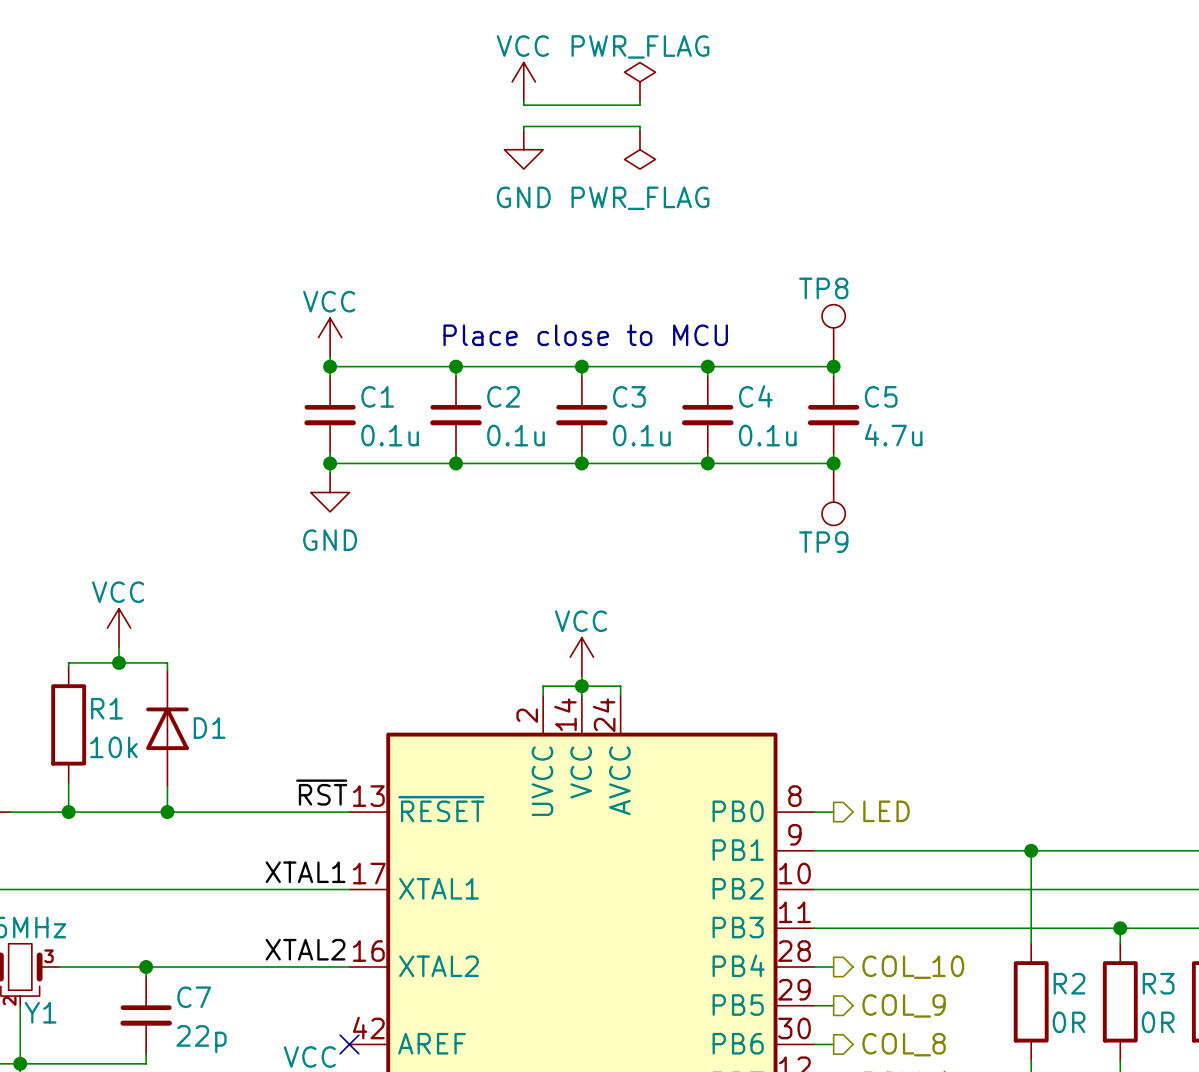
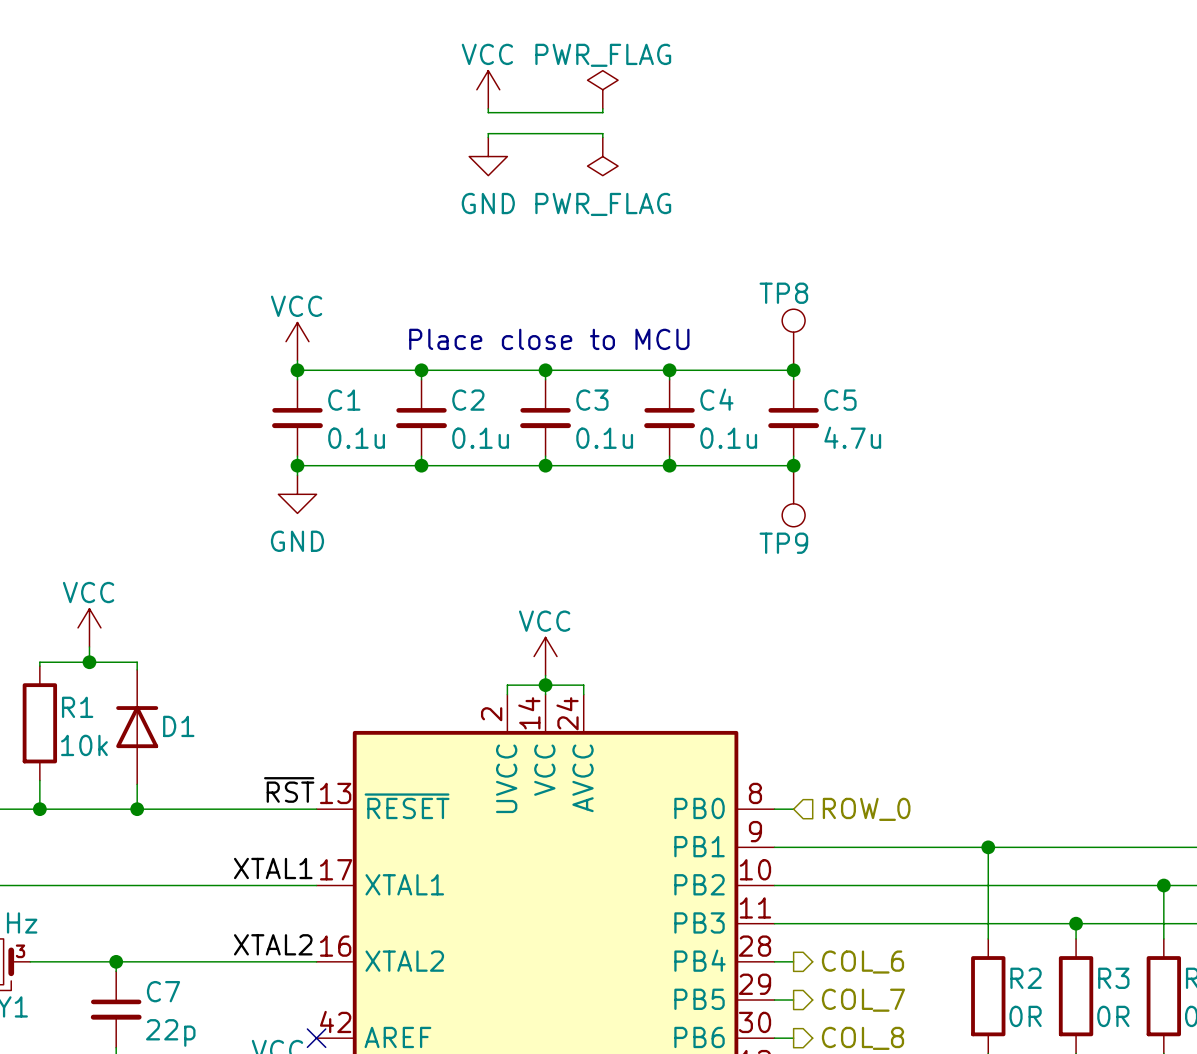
hierarchical label shape: output (886, 811) -> input (866, 809)
hierarchical label: LED (886, 811) -> ROW_0 (866, 809)
hierarchical label: COL_10 (913, 967) -> COL_6 (862, 962)
hierarchical label: COL_9 (904, 1005) -> COL_7 (863, 1000)

